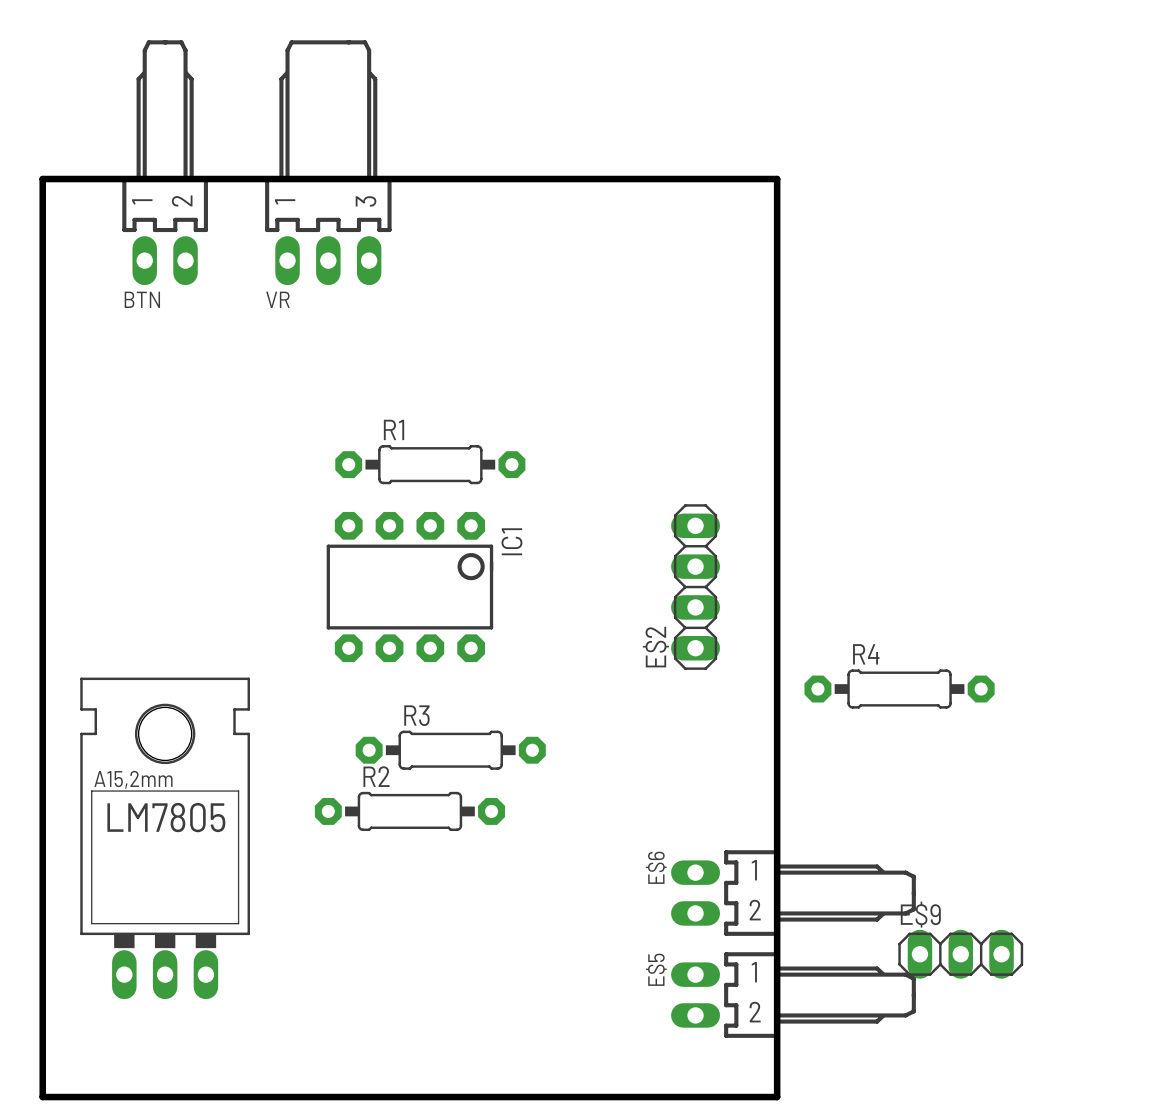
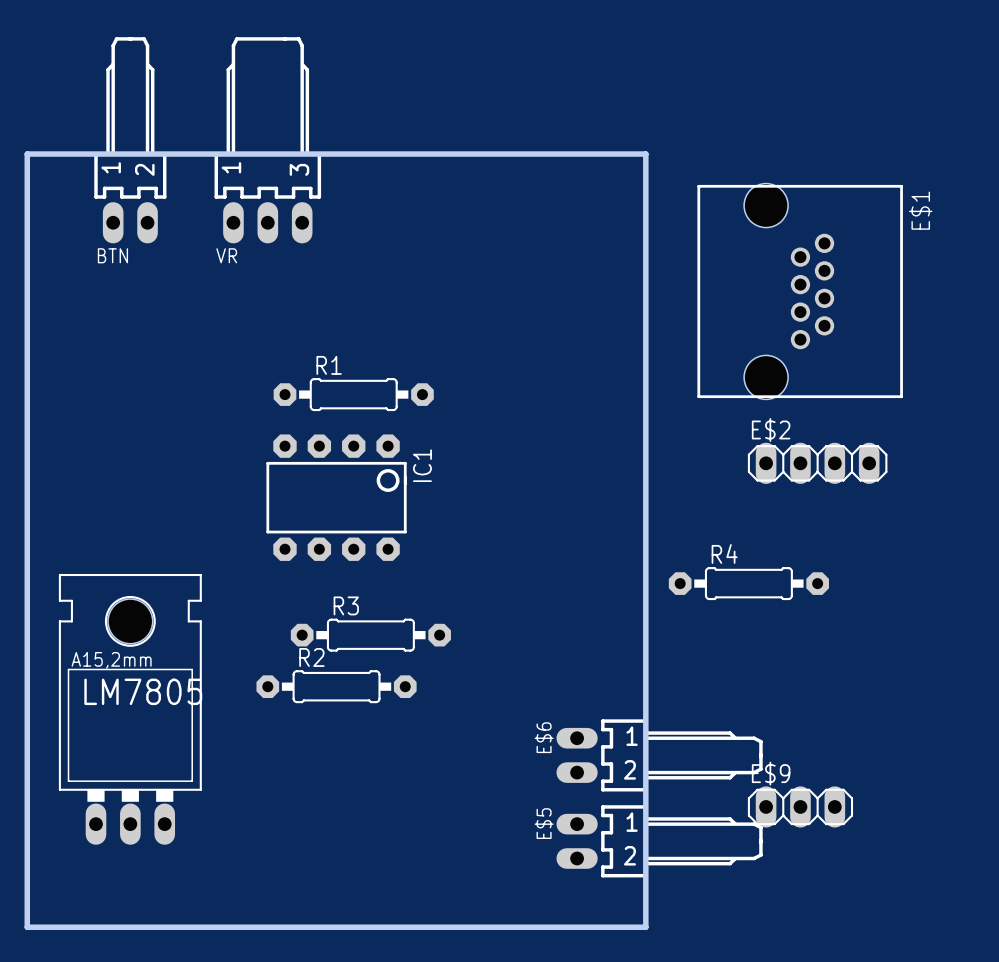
E$1: none -> (800, 291)
E$2 rotation: 0° (695, 587) -> 90° clockwise (817, 463)
E$2 position: (695, 587) -> (817, 463)

